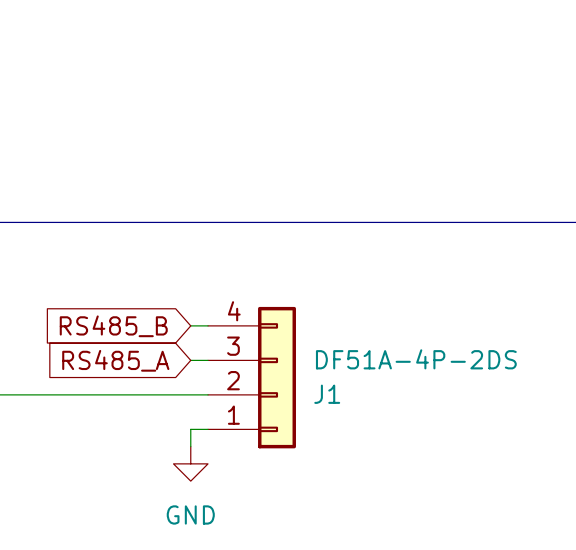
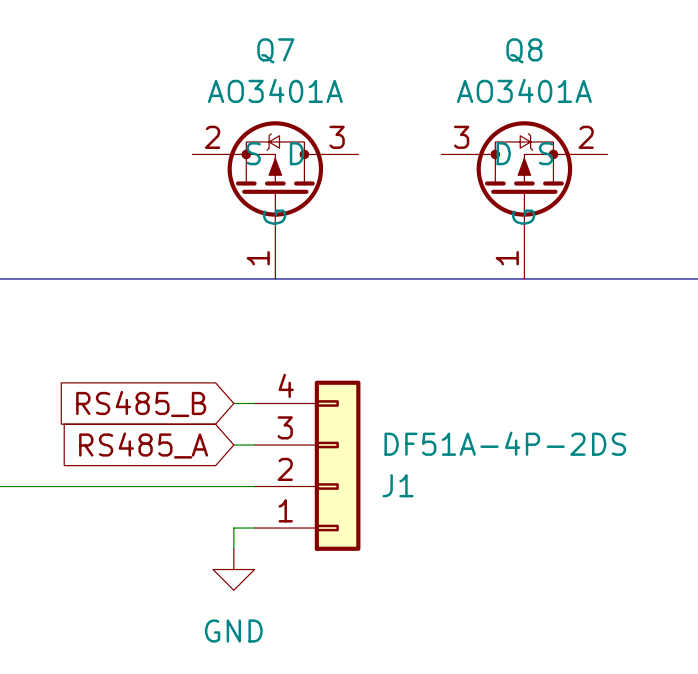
Q7: none -> AO3401A (275, 200)
Q8: none -> AO3401A (524, 200)

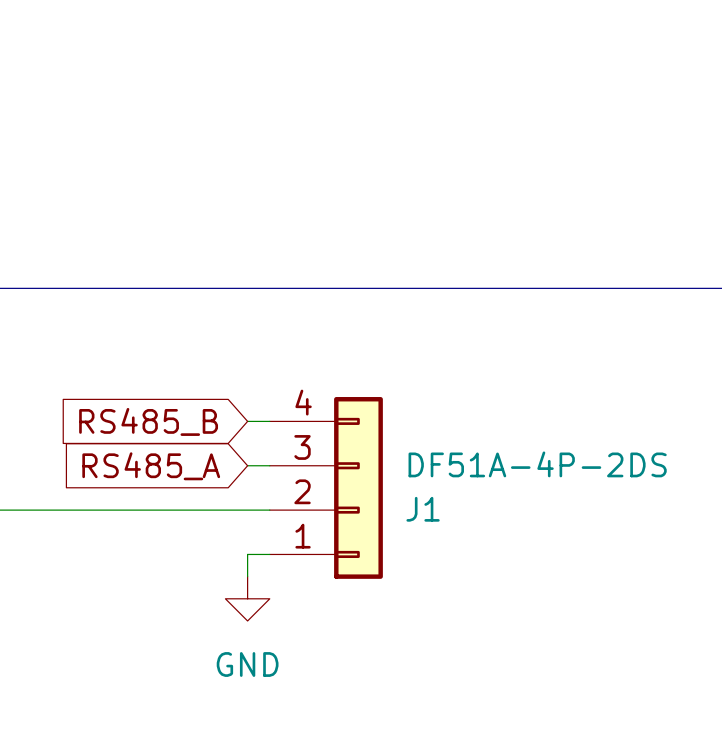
Q7: AO3401A (275, 200) -> none
Q8: AO3401A (524, 200) -> none

